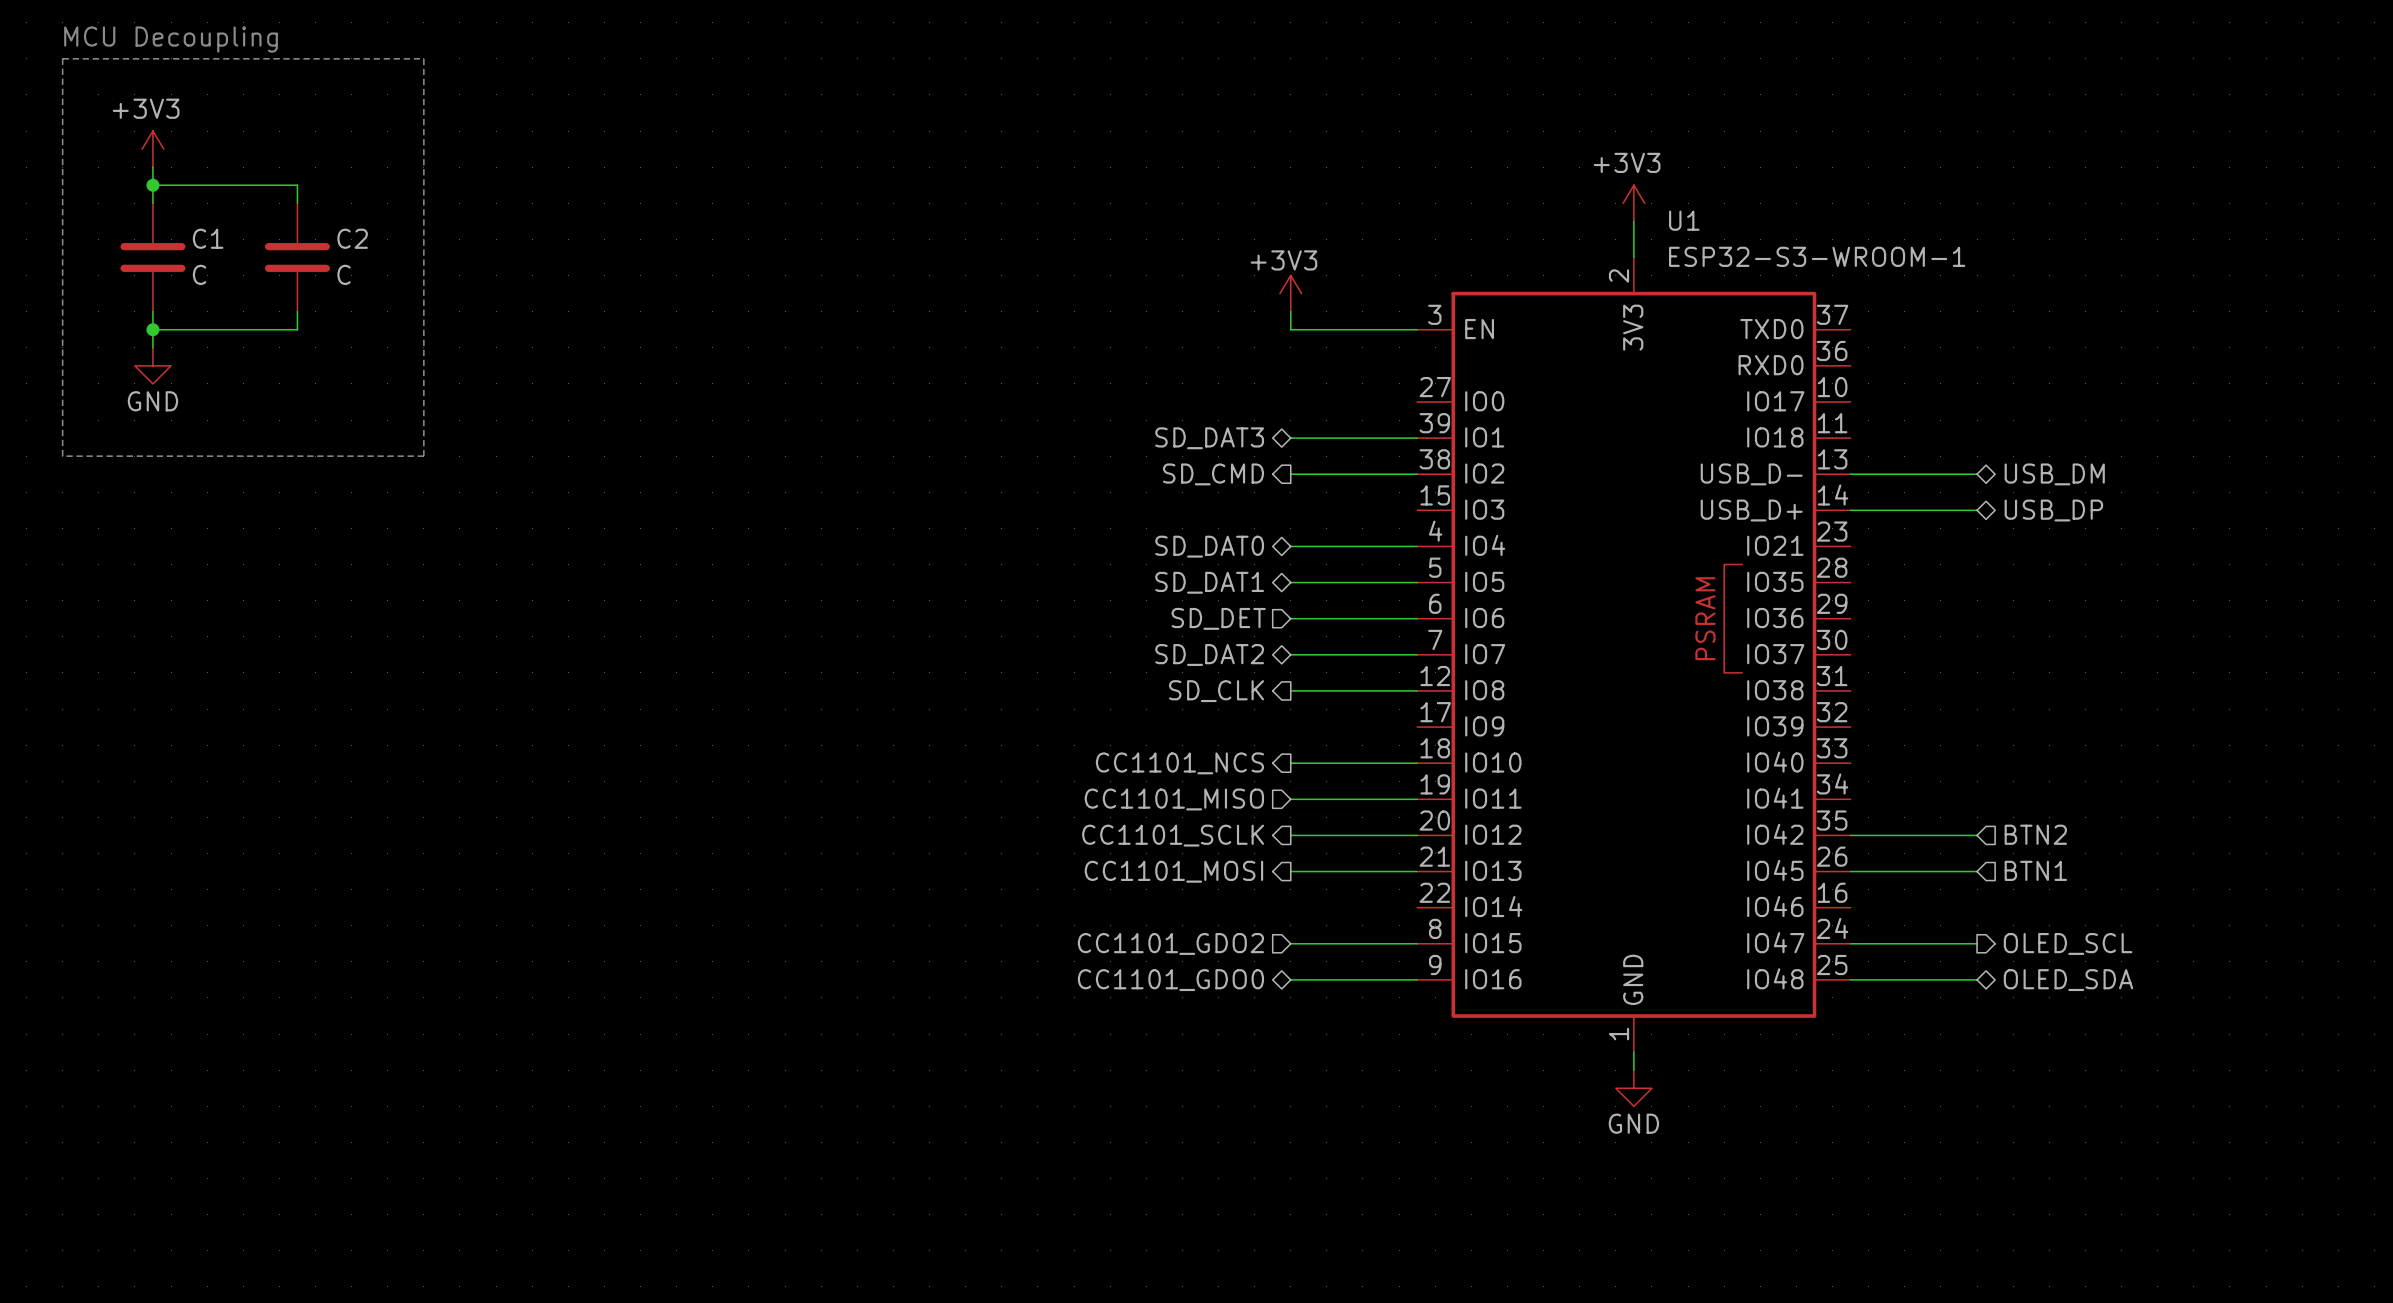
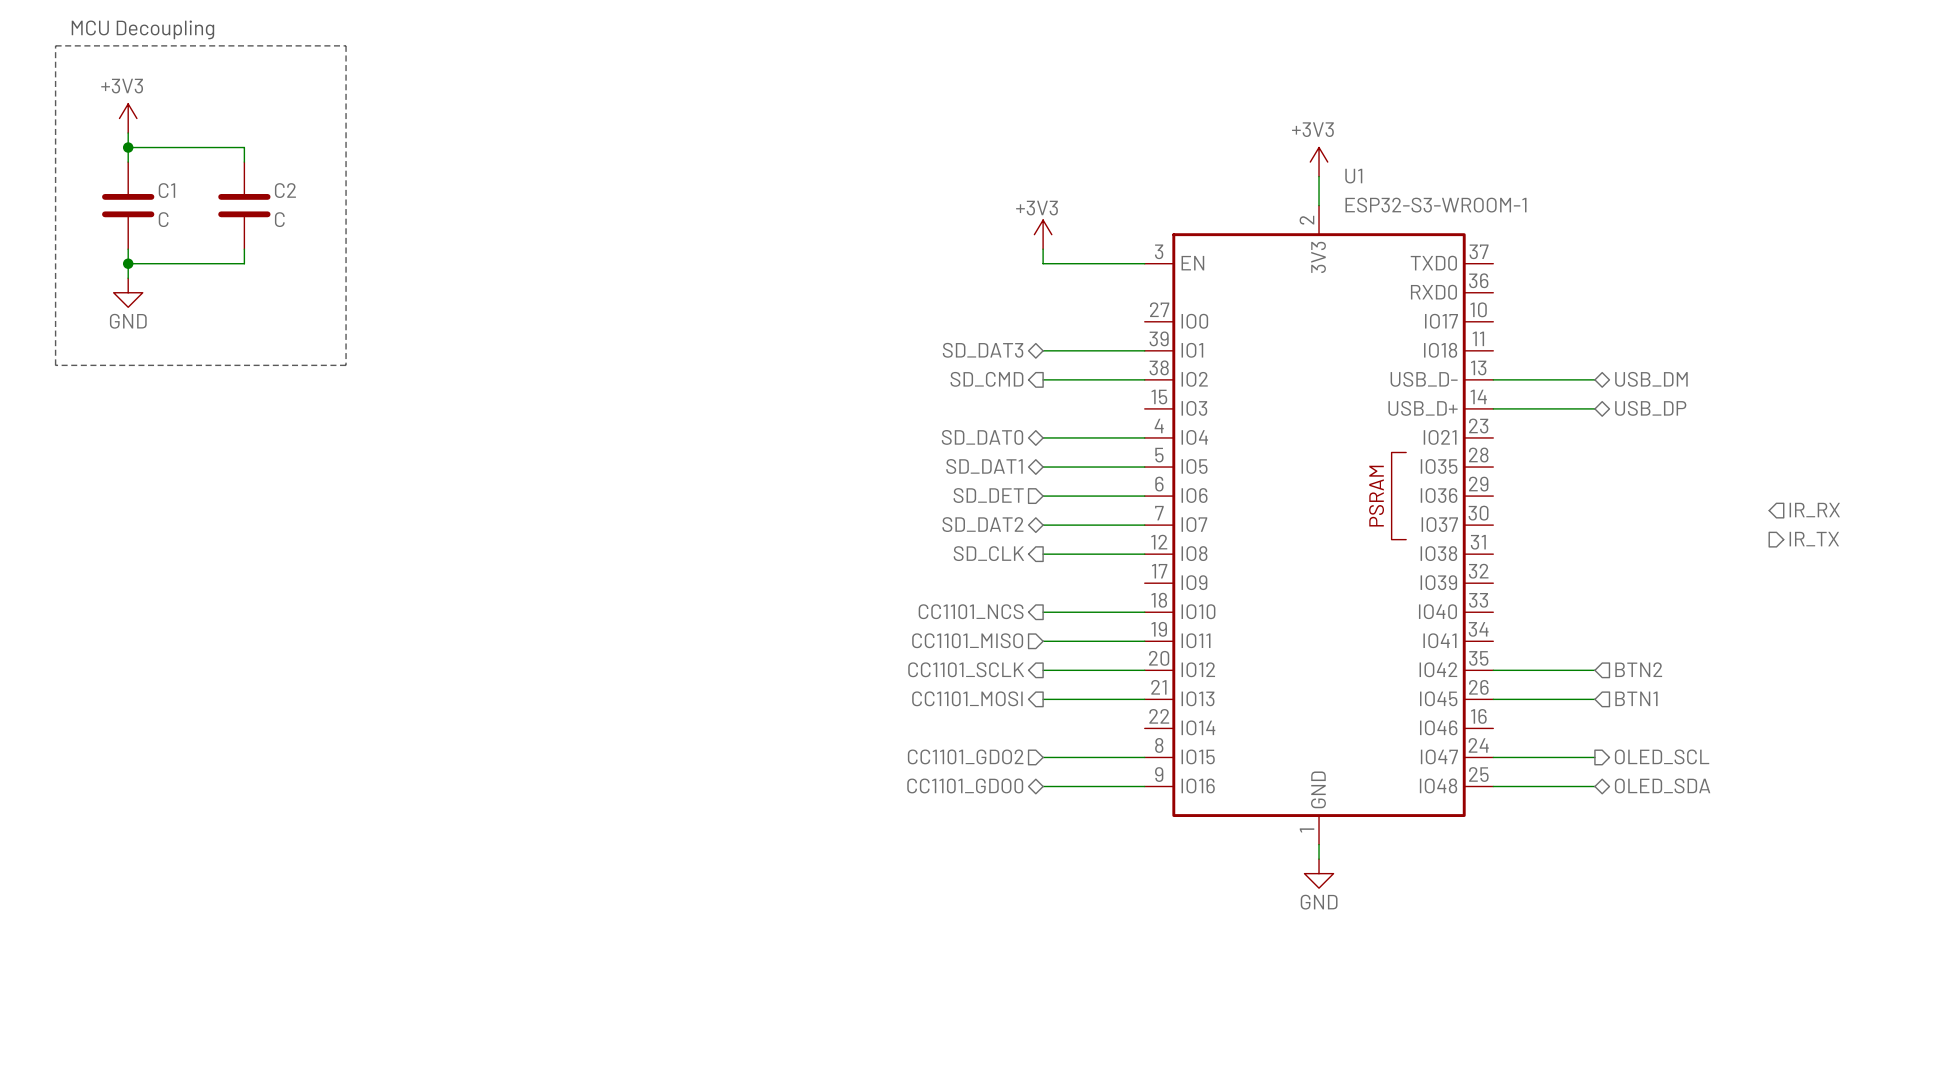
hierarchical label: none -> IR_RX (1814, 510)
hierarchical label: none -> IR_TX (1814, 539)

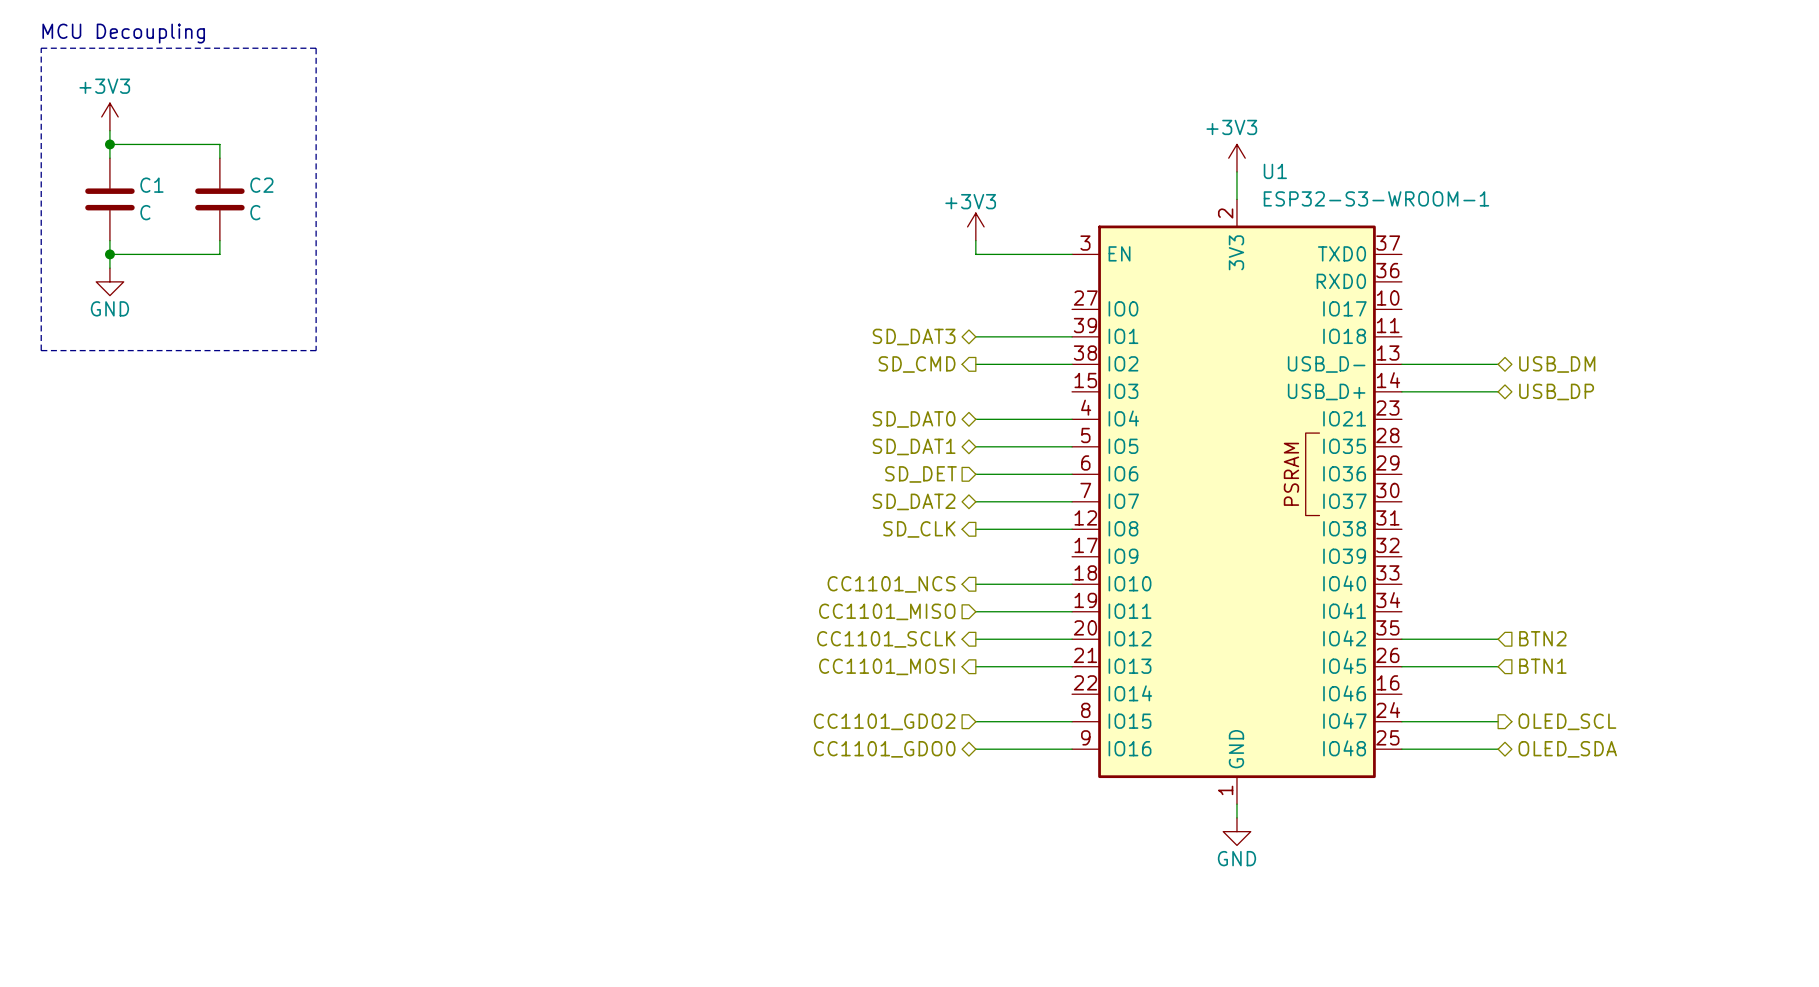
hierarchical label: IR_RX (1814, 510) -> none
hierarchical label: IR_TX (1814, 539) -> none

